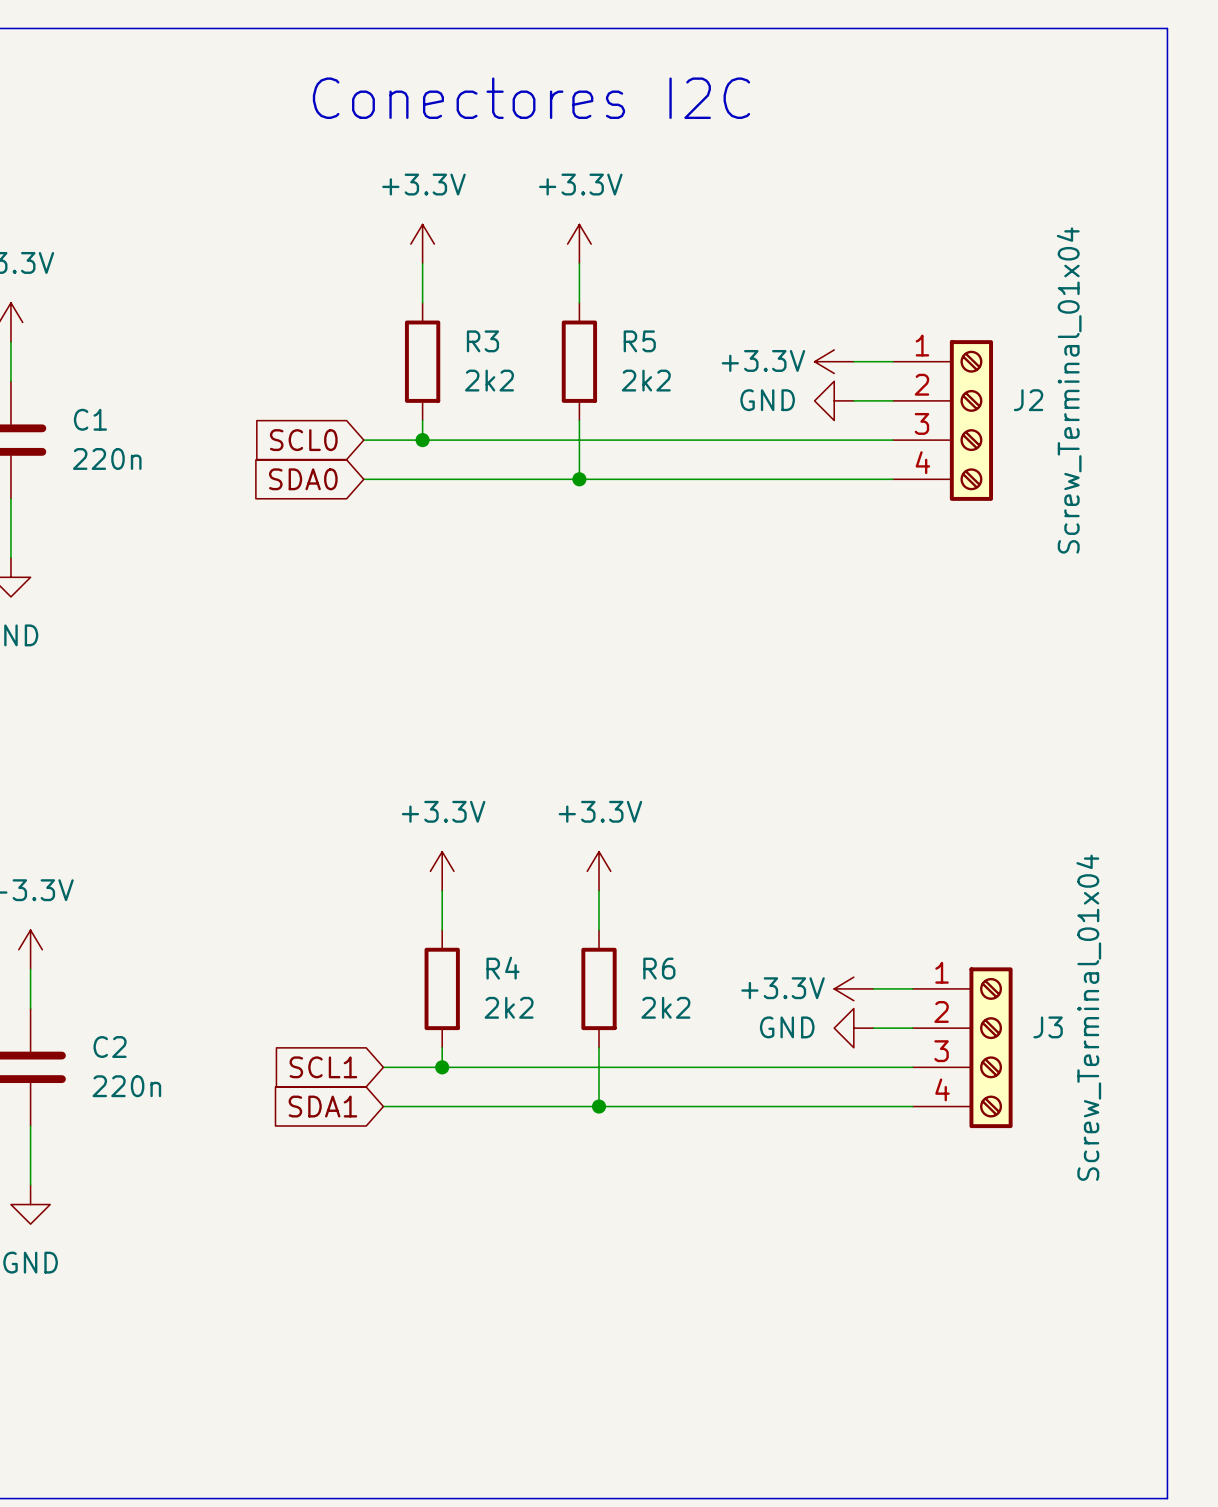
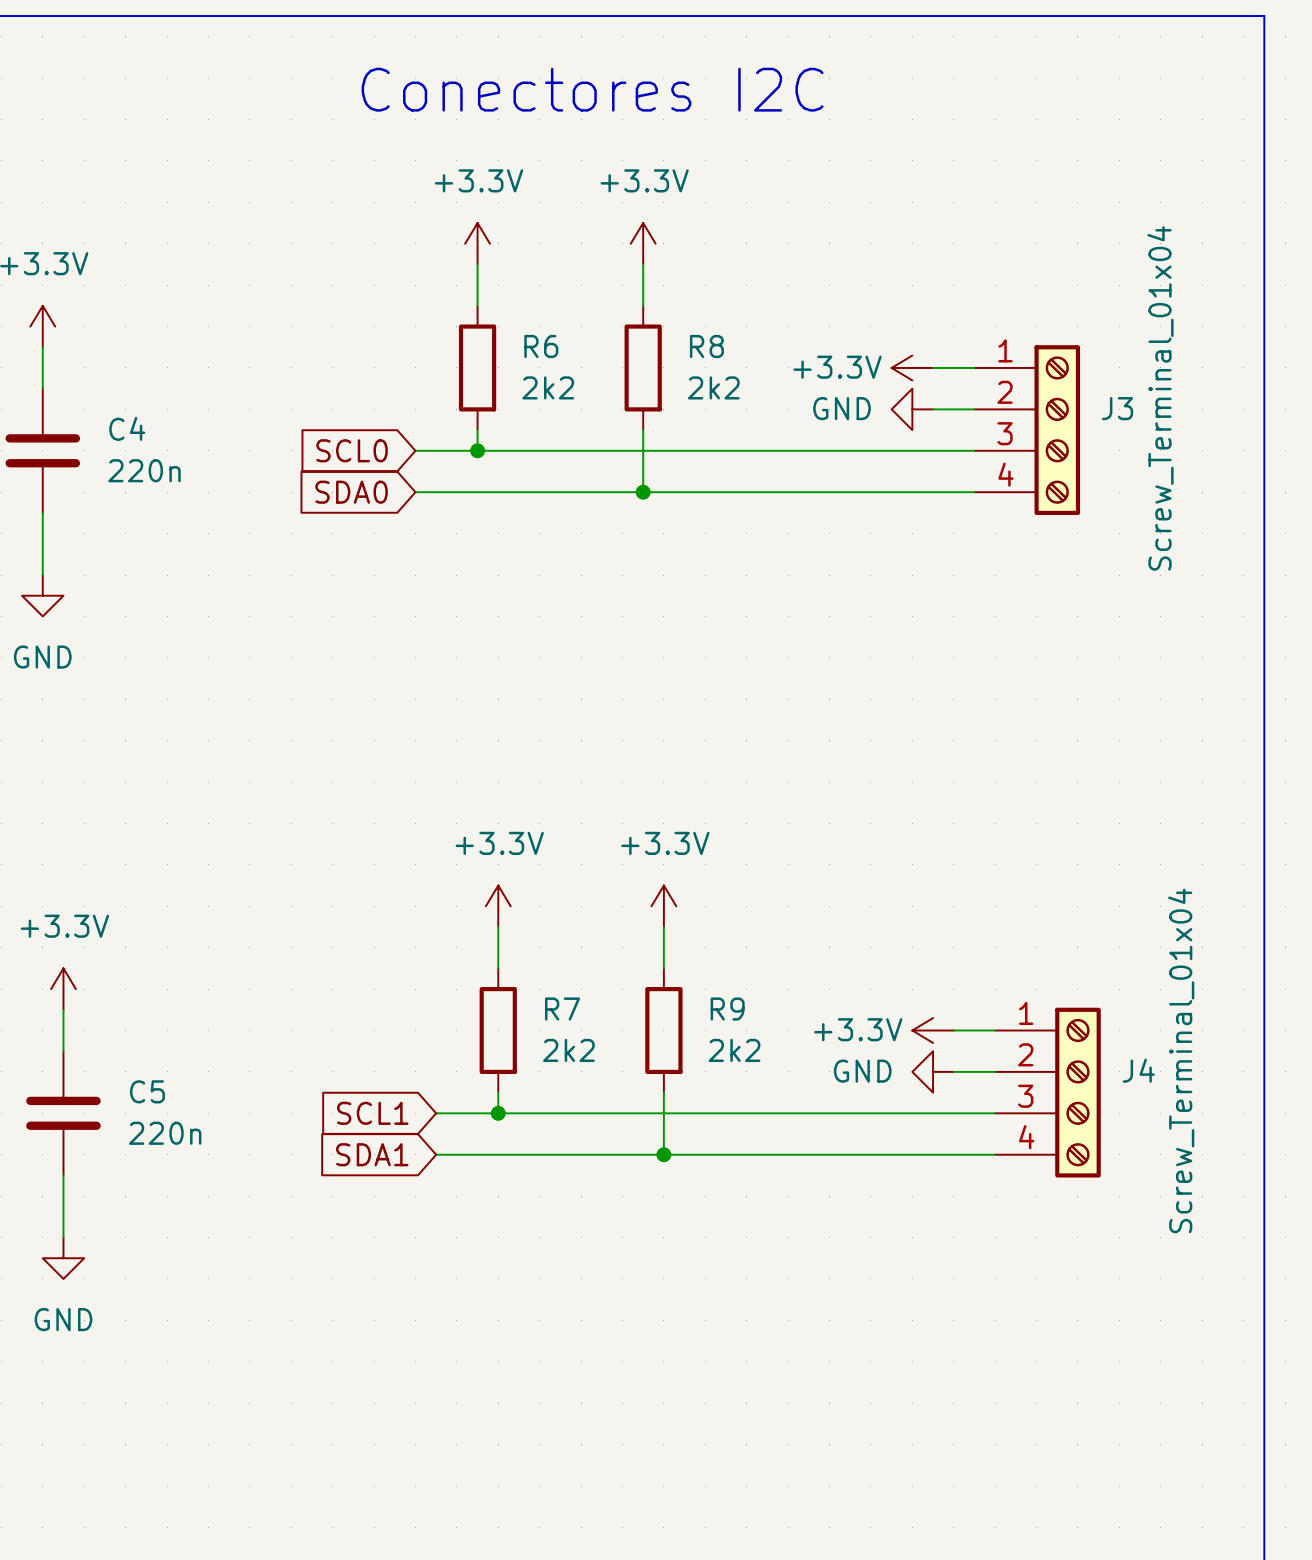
R3 name: R3 (482, 341) -> R6 (541, 346)
R5 name: R5 (639, 341) -> R8 (706, 346)
J2 name: J2 (1028, 400) -> J3 (1117, 408)
C1 name: C1 (90, 419) -> C4 (127, 428)
R4 name: R4 (503, 968) -> R7 (562, 1009)
R6 name: R6 (659, 968) -> R9 (727, 1009)
J3 name: J3 (1048, 1027) -> J4 (1138, 1070)
C2 name: C2 (110, 1047) -> C5 (147, 1091)

